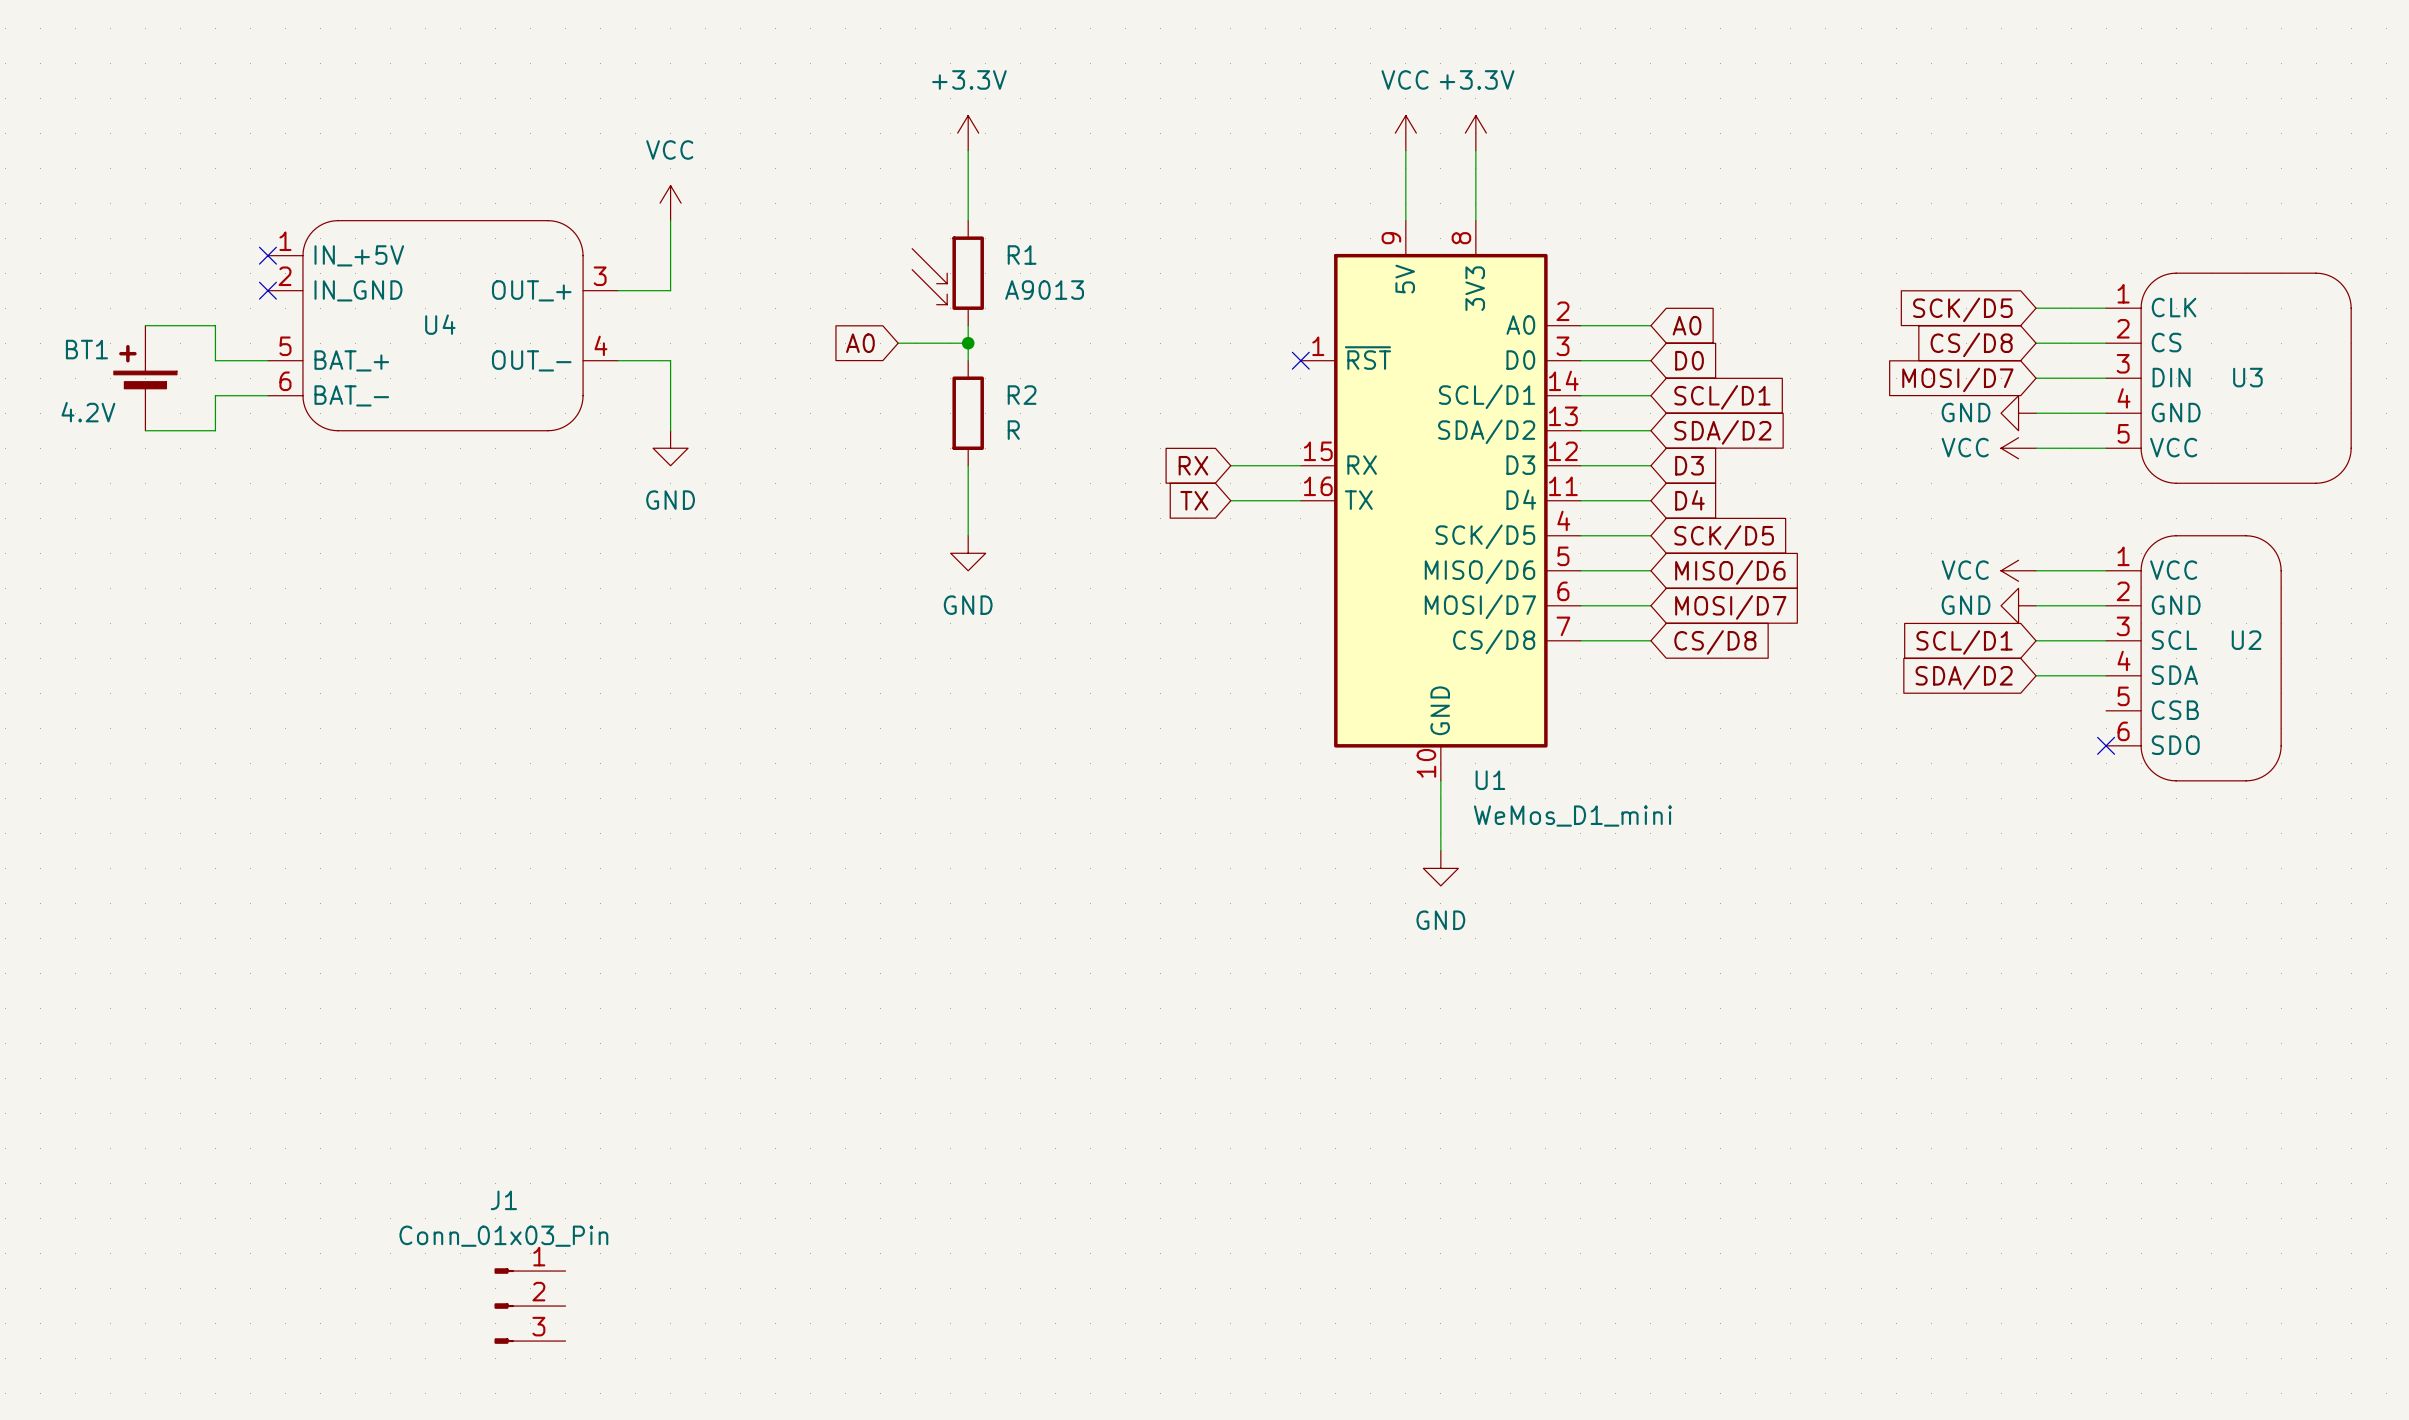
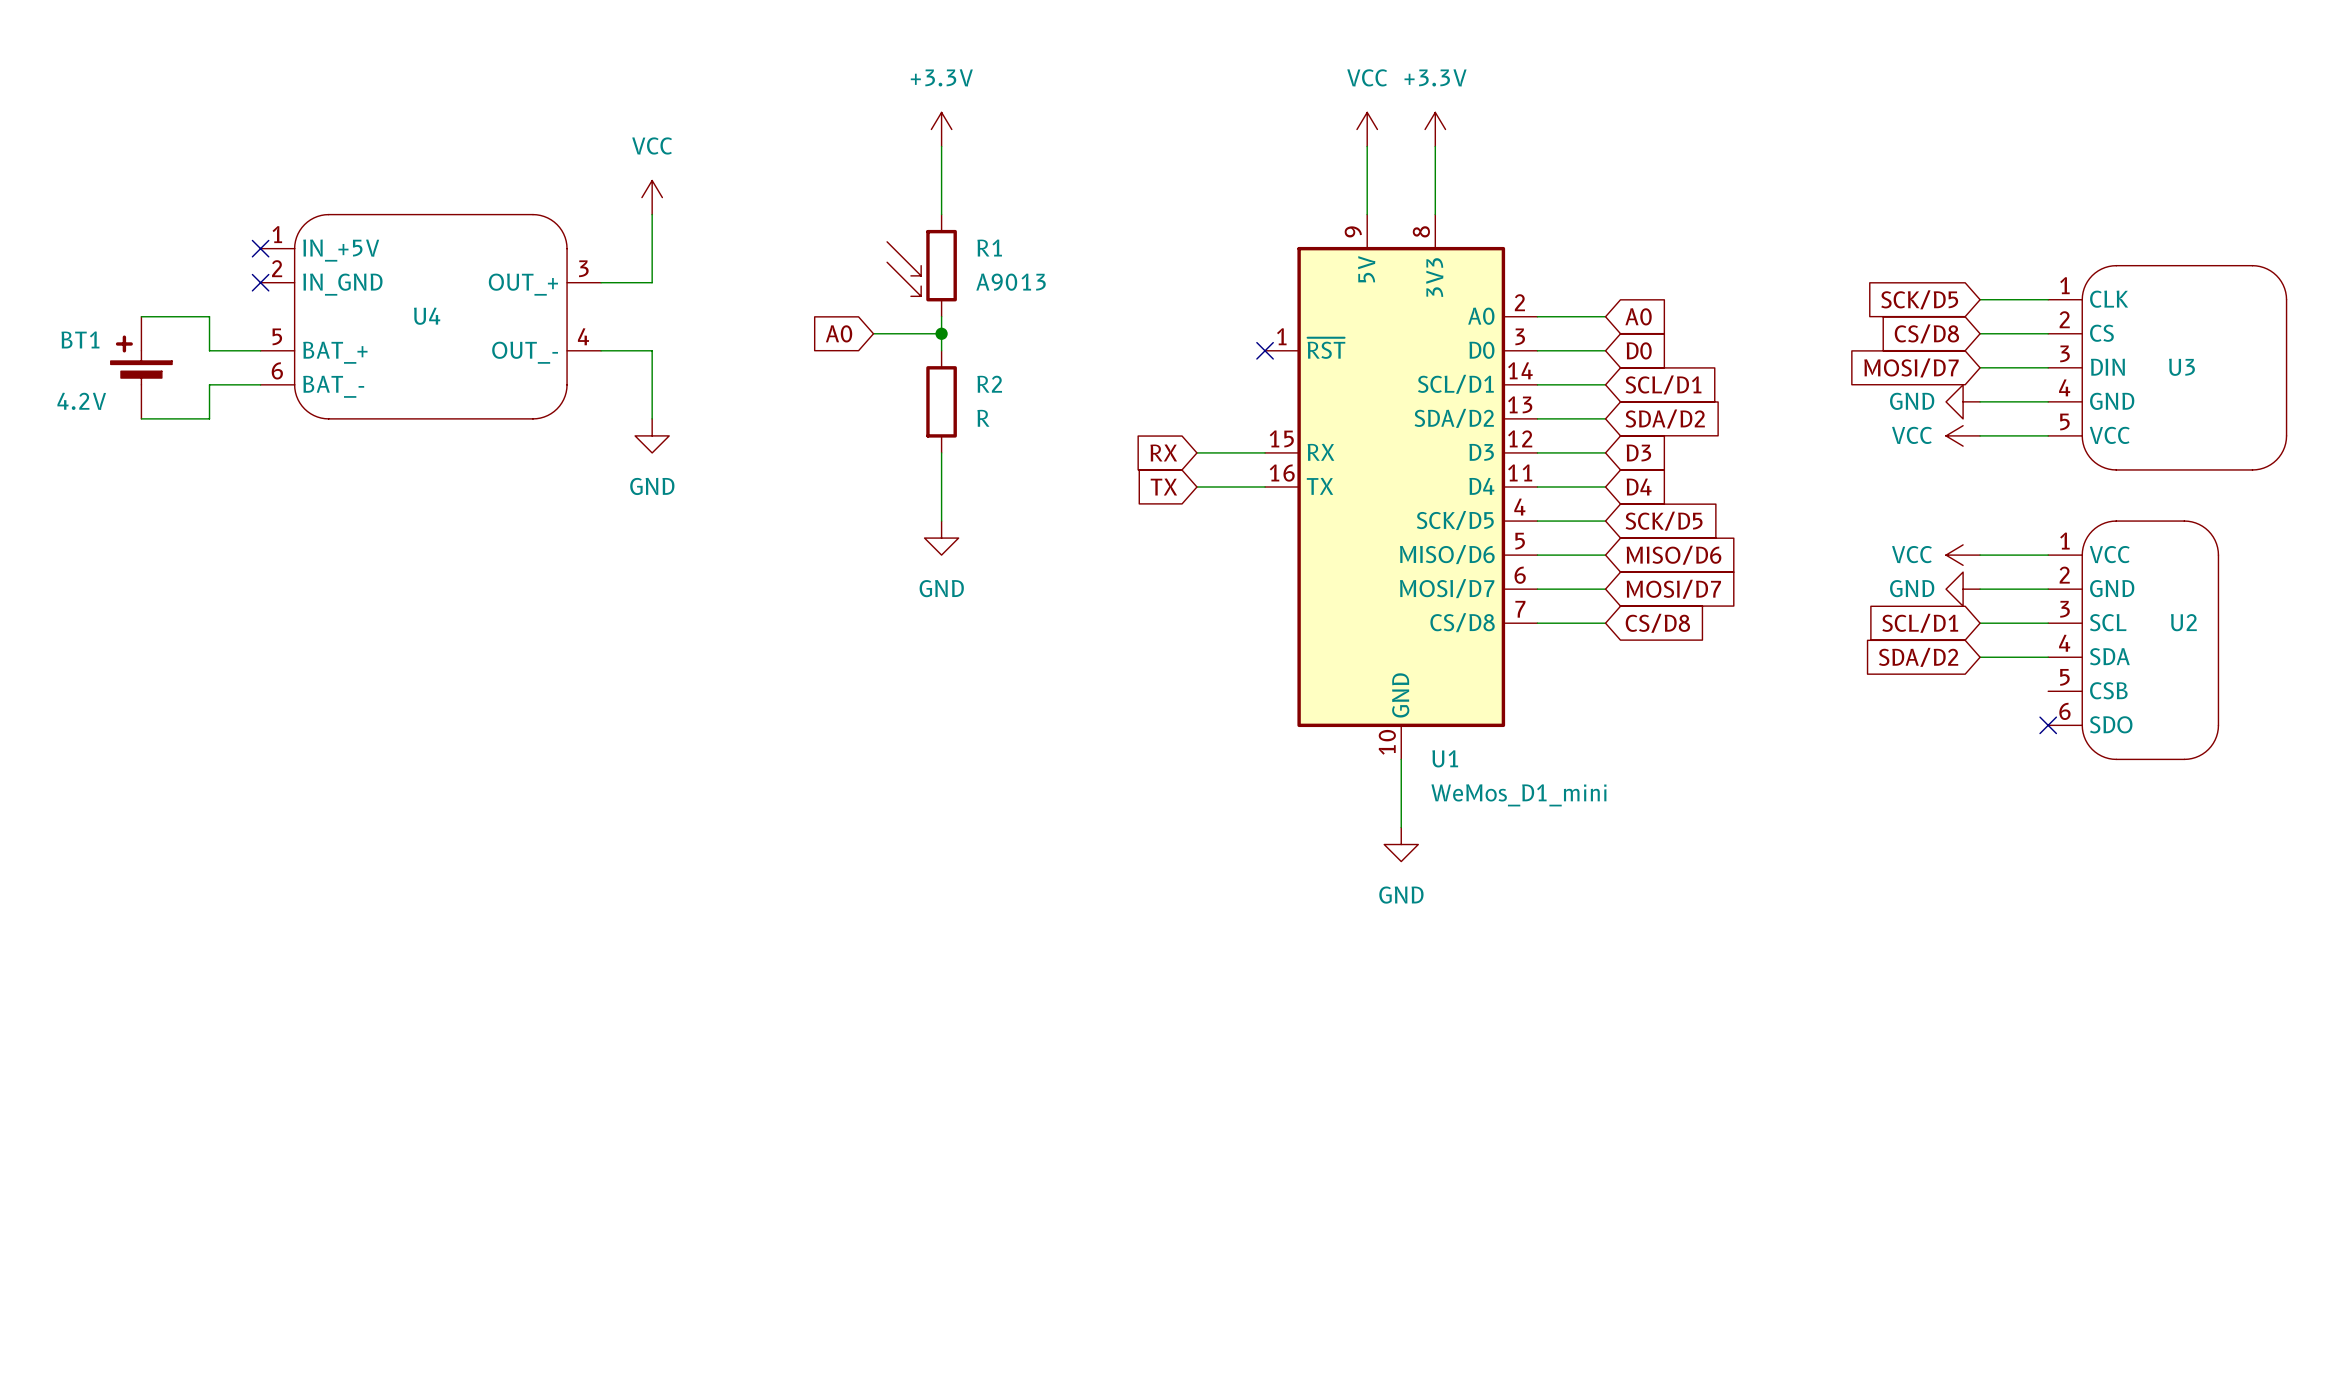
J1: Conn_01x03_Pin (530, 1306) -> none

